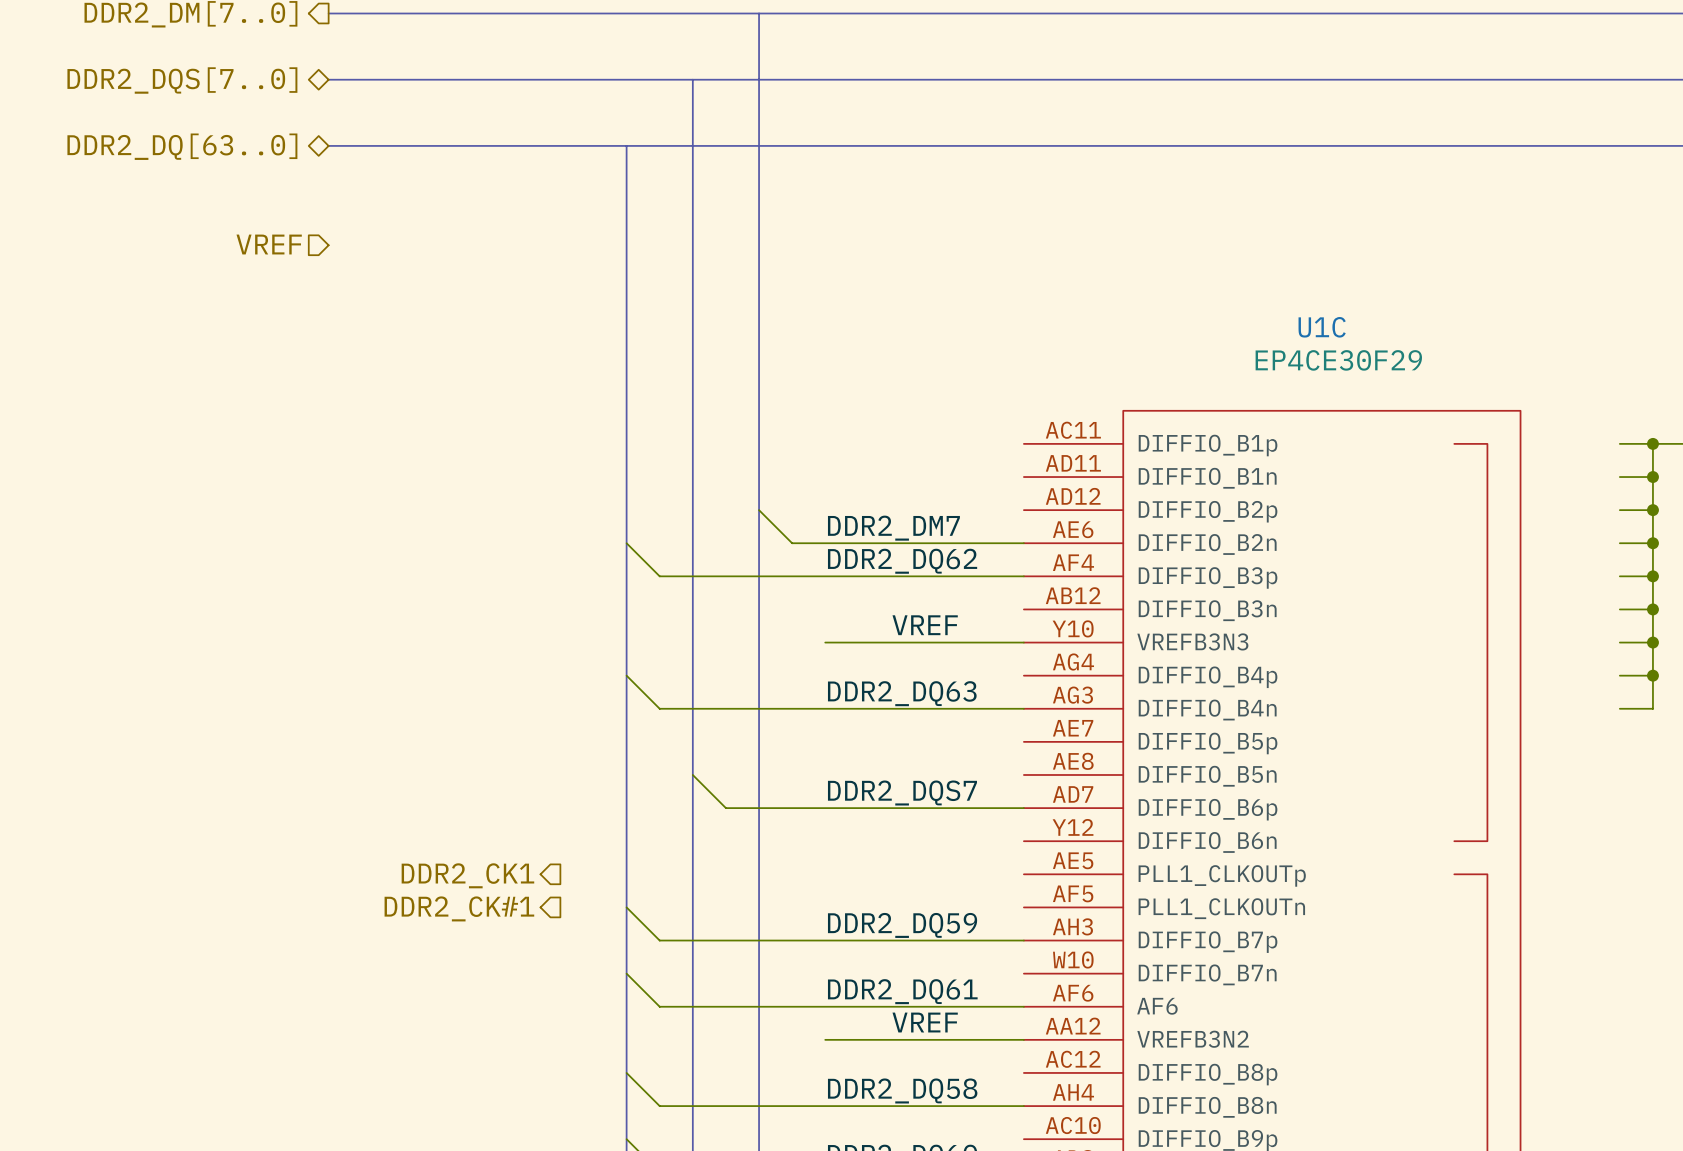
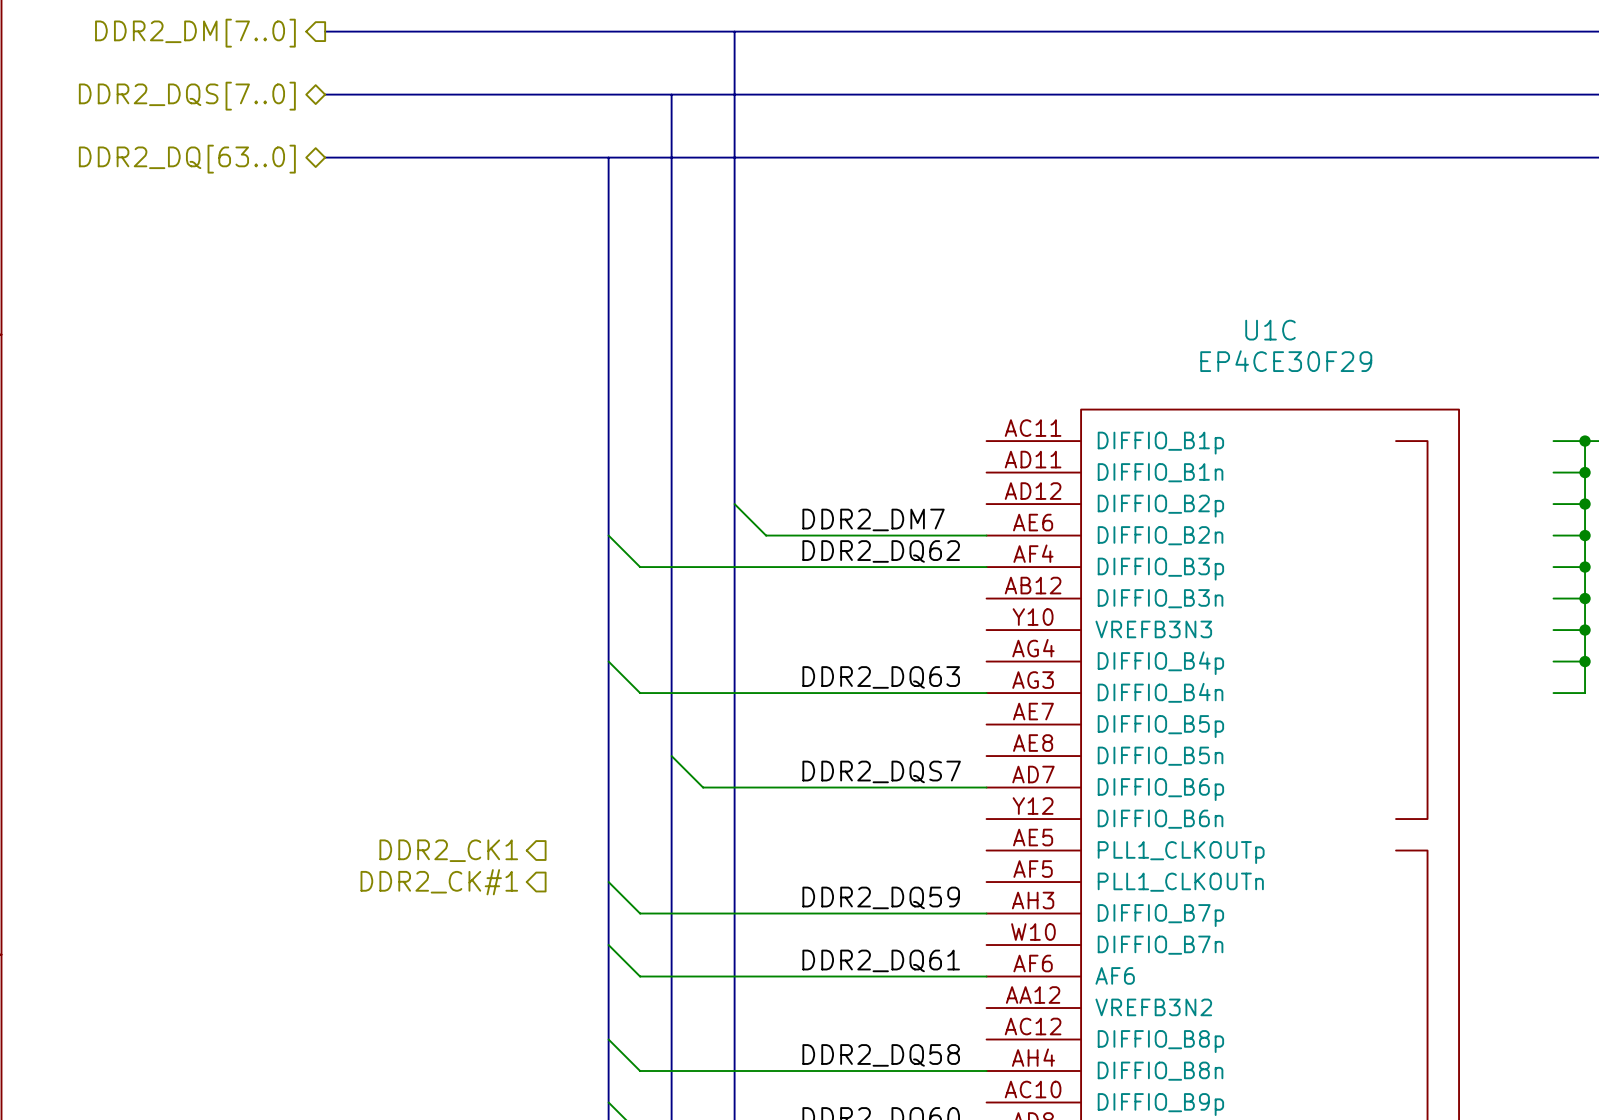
hierarchical label: VREF (269, 244) -> none
label: VREF (925, 625) -> none
wire: (825, 642) (1023, 642) -> none
label: VREF (925, 1022) -> none
wire: (825, 1039) (1023, 1039) -> none

